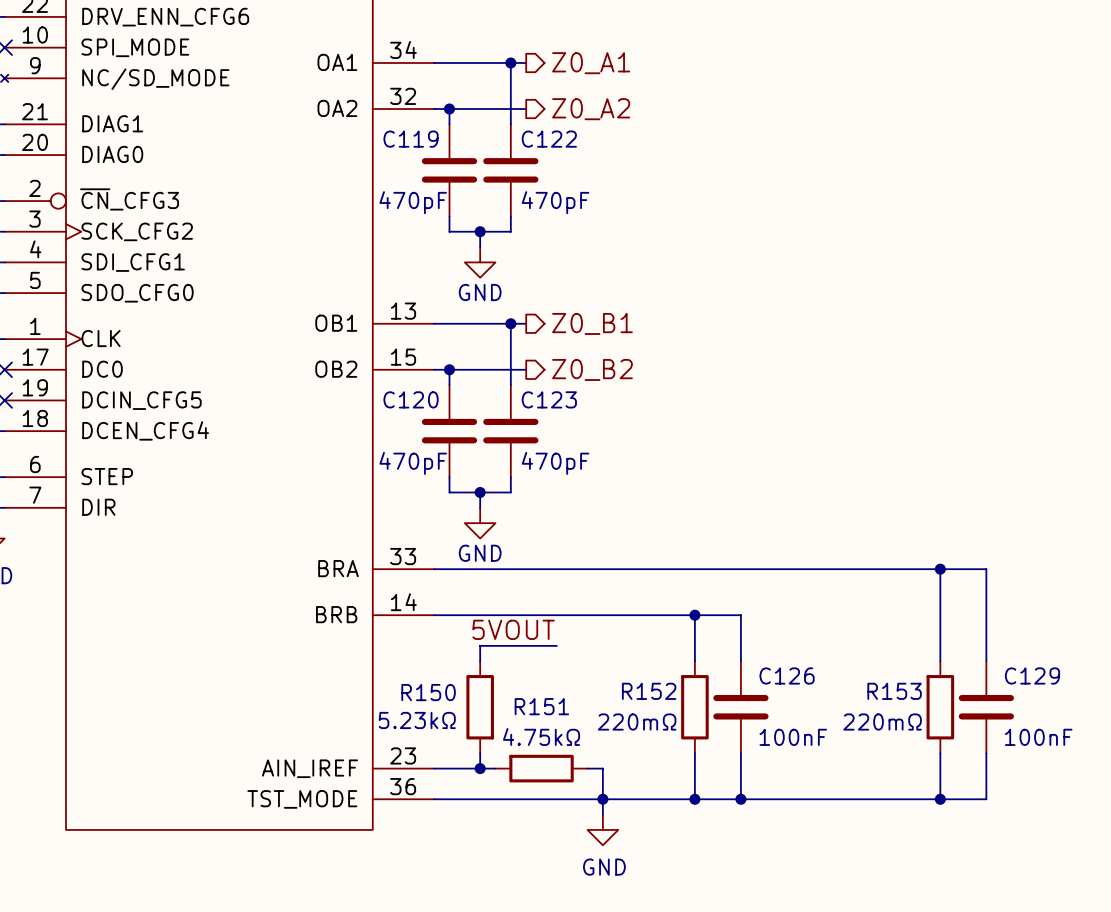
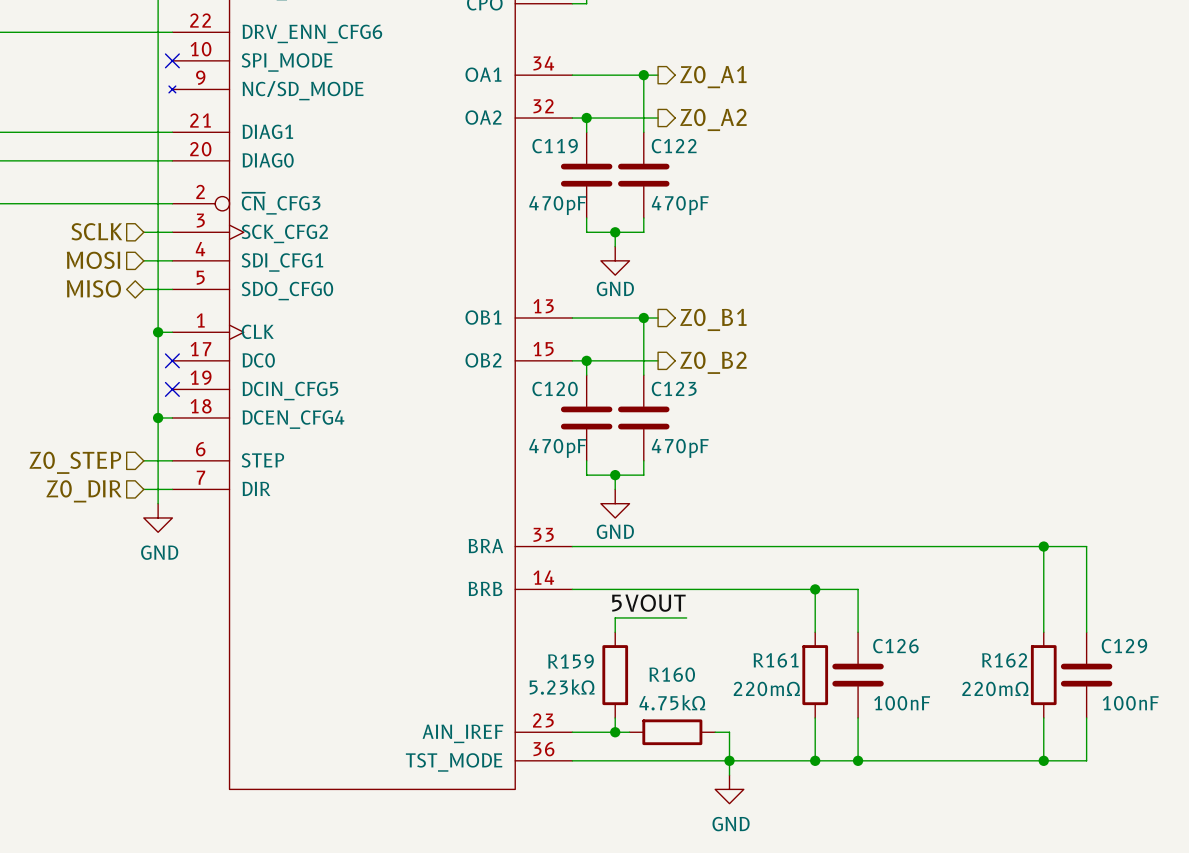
R152 name: R152 (649, 691) -> R161 (776, 660)
R153 name: R153 (894, 691) -> R162 (1004, 660)
R150 name: R150 (428, 692) -> R159 (570, 661)
R151 name: R151 (541, 706) -> R160 (672, 674)

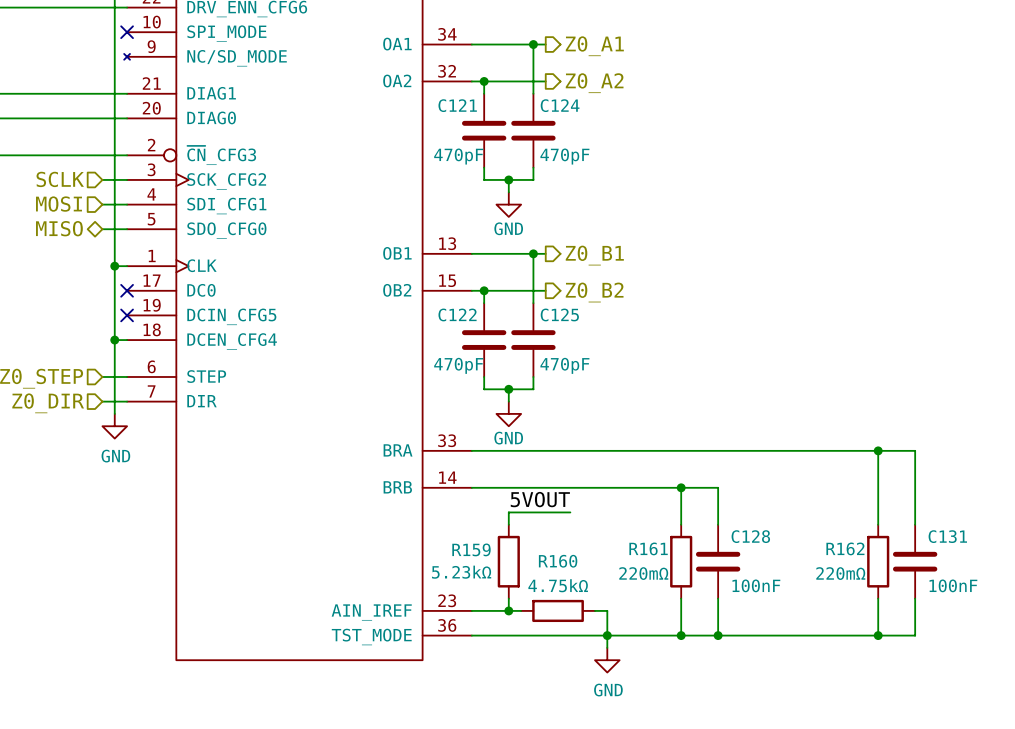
C119 name: C119 (555, 146) -> C121 (457, 105)
C122 name: C122 (674, 146) -> C124 (560, 105)
C120 name: C120 (555, 388) -> C122 (457, 314)
C123 name: C123 (674, 388) -> C125 (559, 314)
C126 name: C126 (895, 646) -> C128 (750, 536)
C129 name: C129 (1124, 646) -> C131 (947, 536)

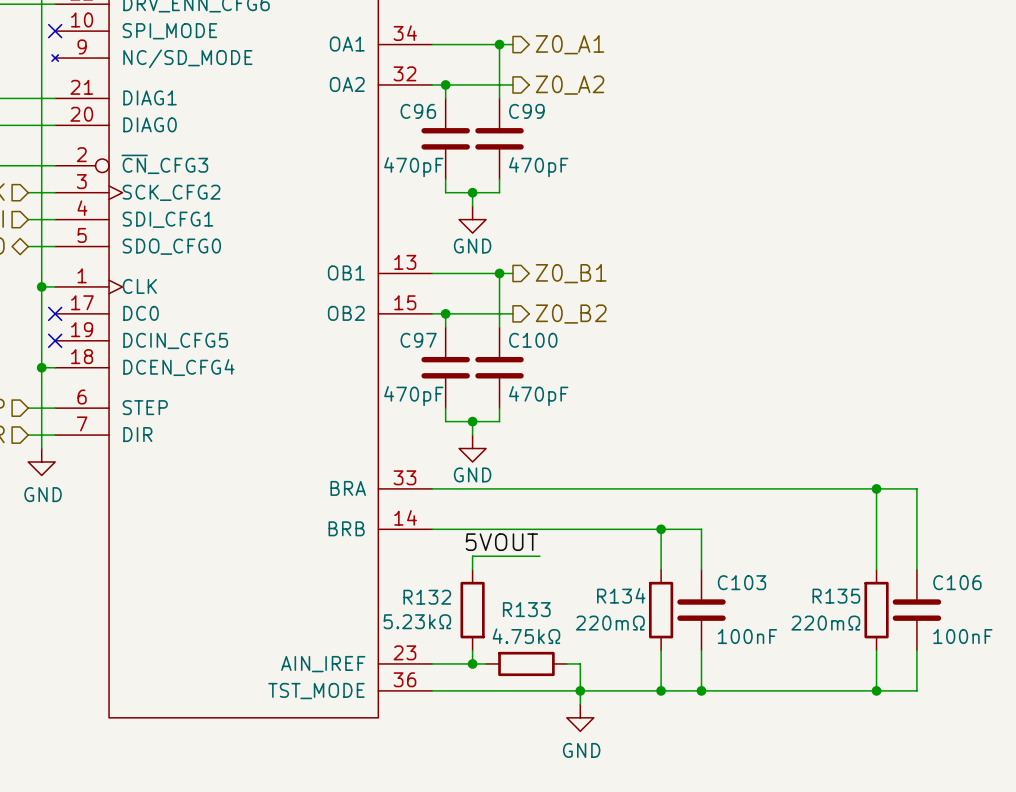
C121 name: C121 (457, 105) -> C96 (418, 111)
C124 name: C124 (560, 105) -> C99 (526, 111)
C122 name: C122 (457, 314) -> C97 (418, 340)
C125 name: C125 (559, 314) -> C100 (533, 340)
C128 name: C128 (750, 536) -> C103 (741, 582)
C131 name: C131 (947, 536) -> C106 (957, 582)
R161 name: R161 (648, 548) -> R134 (621, 595)
R162 name: R162 (845, 548) -> R135 (836, 596)
R159 name: R159 (471, 549) -> R132 (427, 597)
R160 name: R160 (558, 561) -> R133 (526, 609)

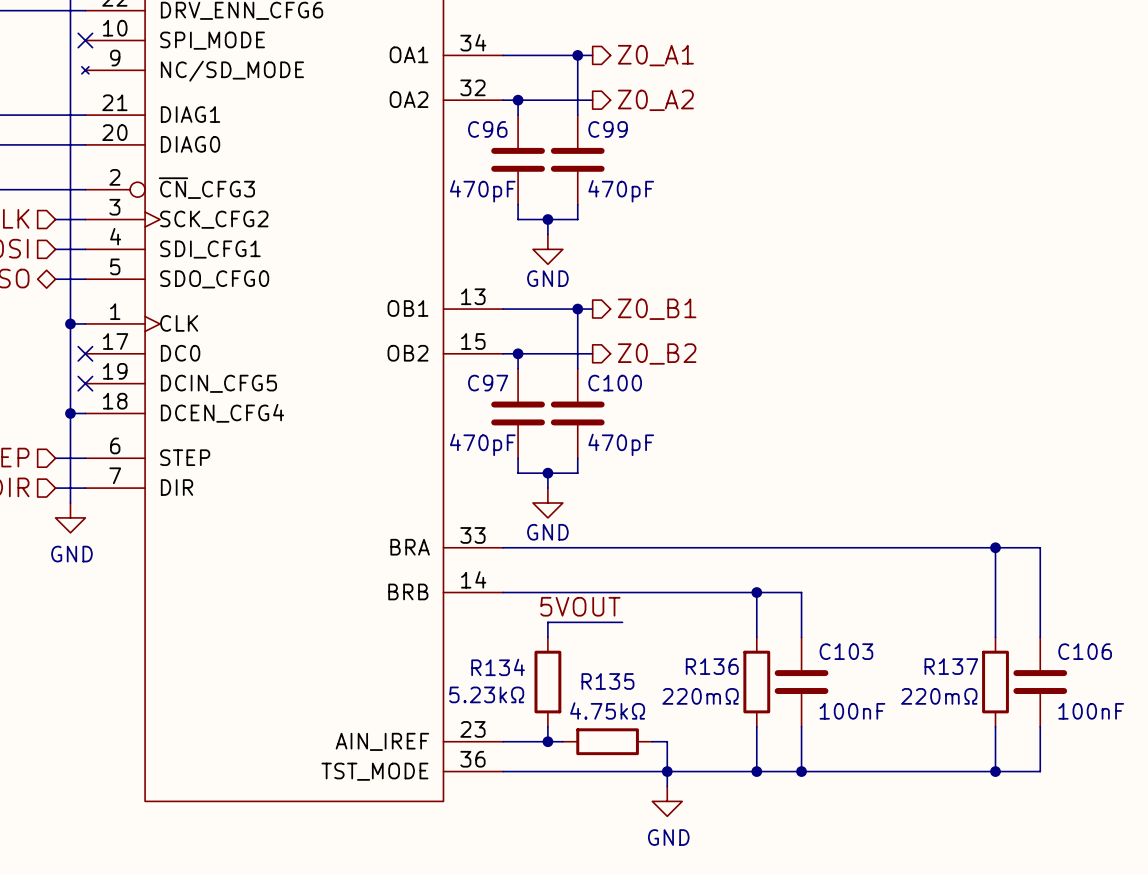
R134 name: R134 (621, 595) -> R136 (712, 666)
R135 name: R135 (836, 596) -> R137 (951, 666)
R132 name: R132 (427, 597) -> R134 (498, 667)
R133 name: R133 (526, 609) -> R135 (607, 681)

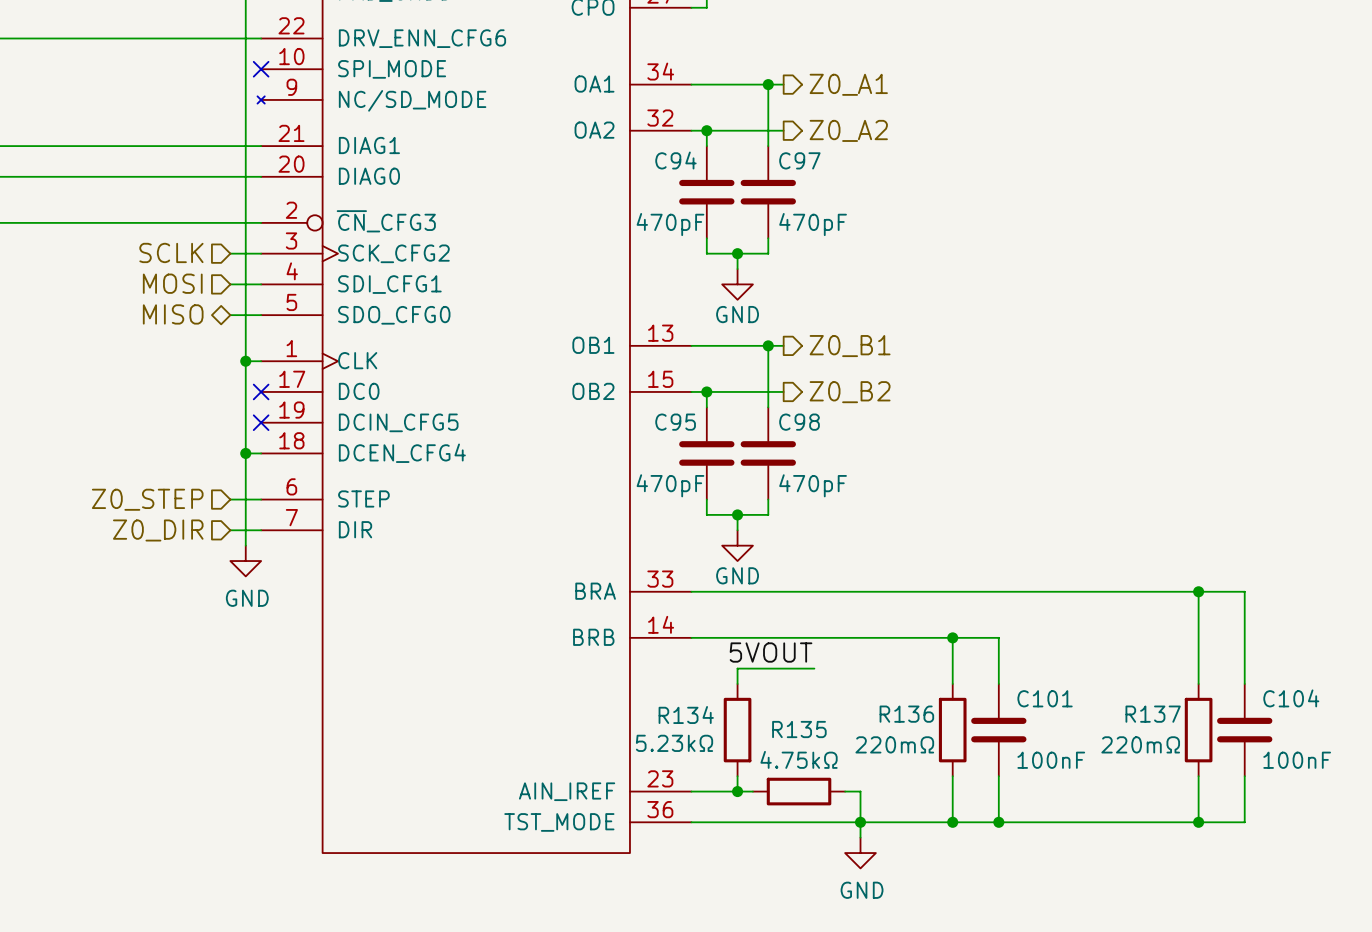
C96 name: C96 (487, 129) -> C94 (675, 160)
C99 name: C99 (608, 129) -> C97 (799, 160)
C97 name: C97 (488, 383) -> C95 (675, 422)
C100 name: C100 (615, 383) -> C98 (799, 422)
C103 name: C103 (846, 651) -> C101 (1045, 698)
C106 name: C106 (1085, 651) -> C104 (1291, 698)

